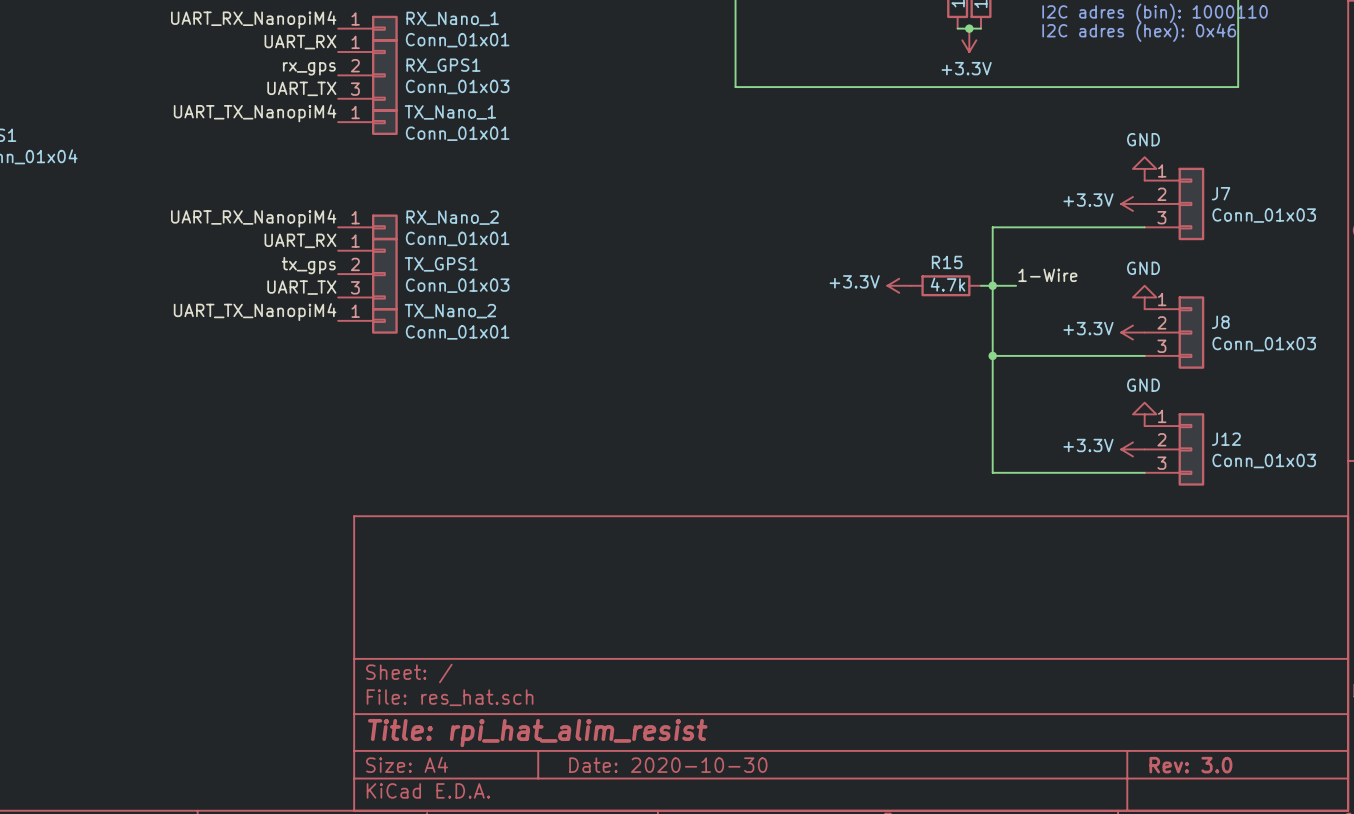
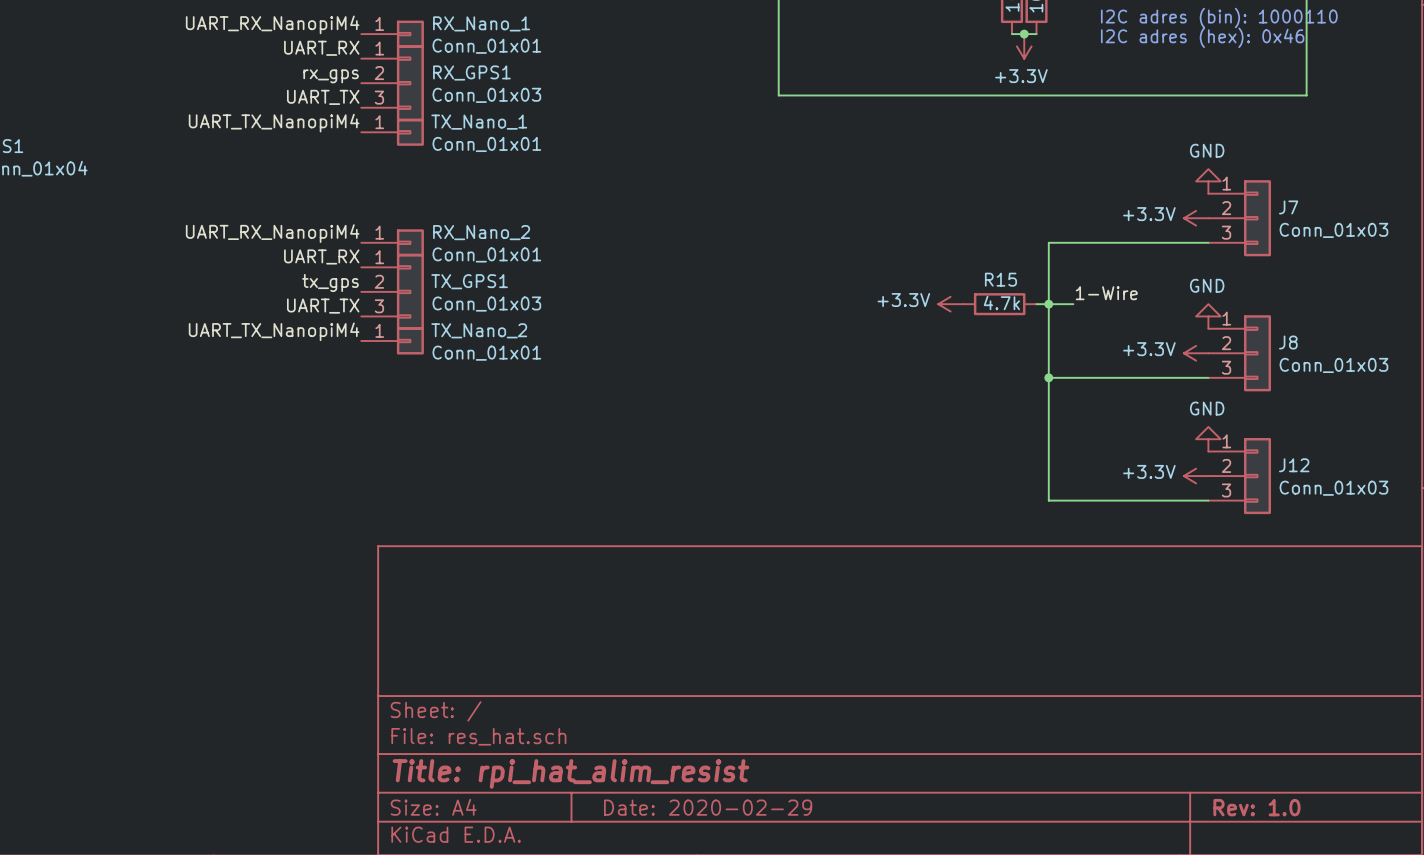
title block: Date: 2020-10-30 (668, 765) -> Date: 2020-02-29 (708, 807)
title block: Rev: 3.0 (1190, 765) -> Rev: 1.0 (1256, 807)

